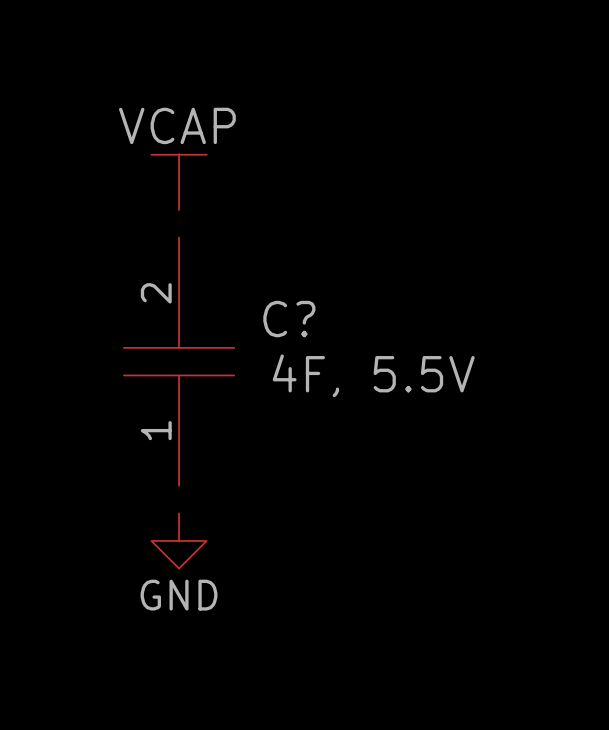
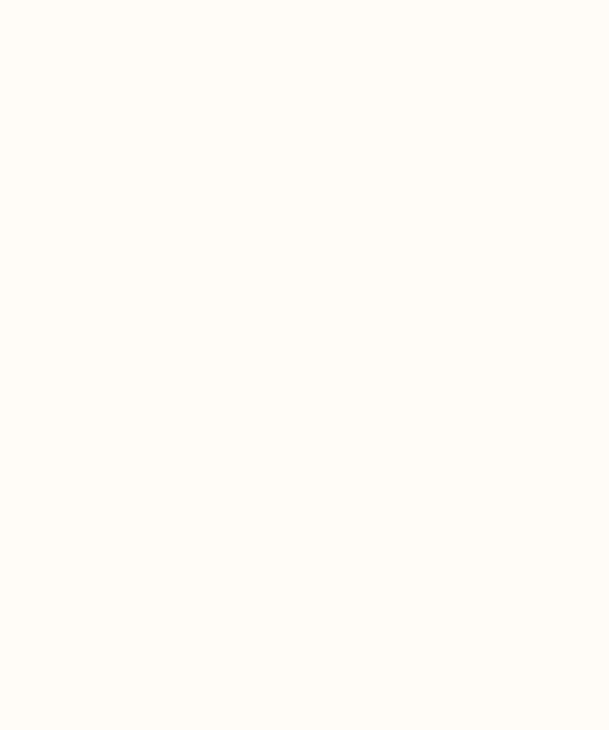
power symbol: VCAP (179, 182) -> none
C?: 4F, 5.5V (179, 361) -> none
power symbol: GND (179, 540) -> none

